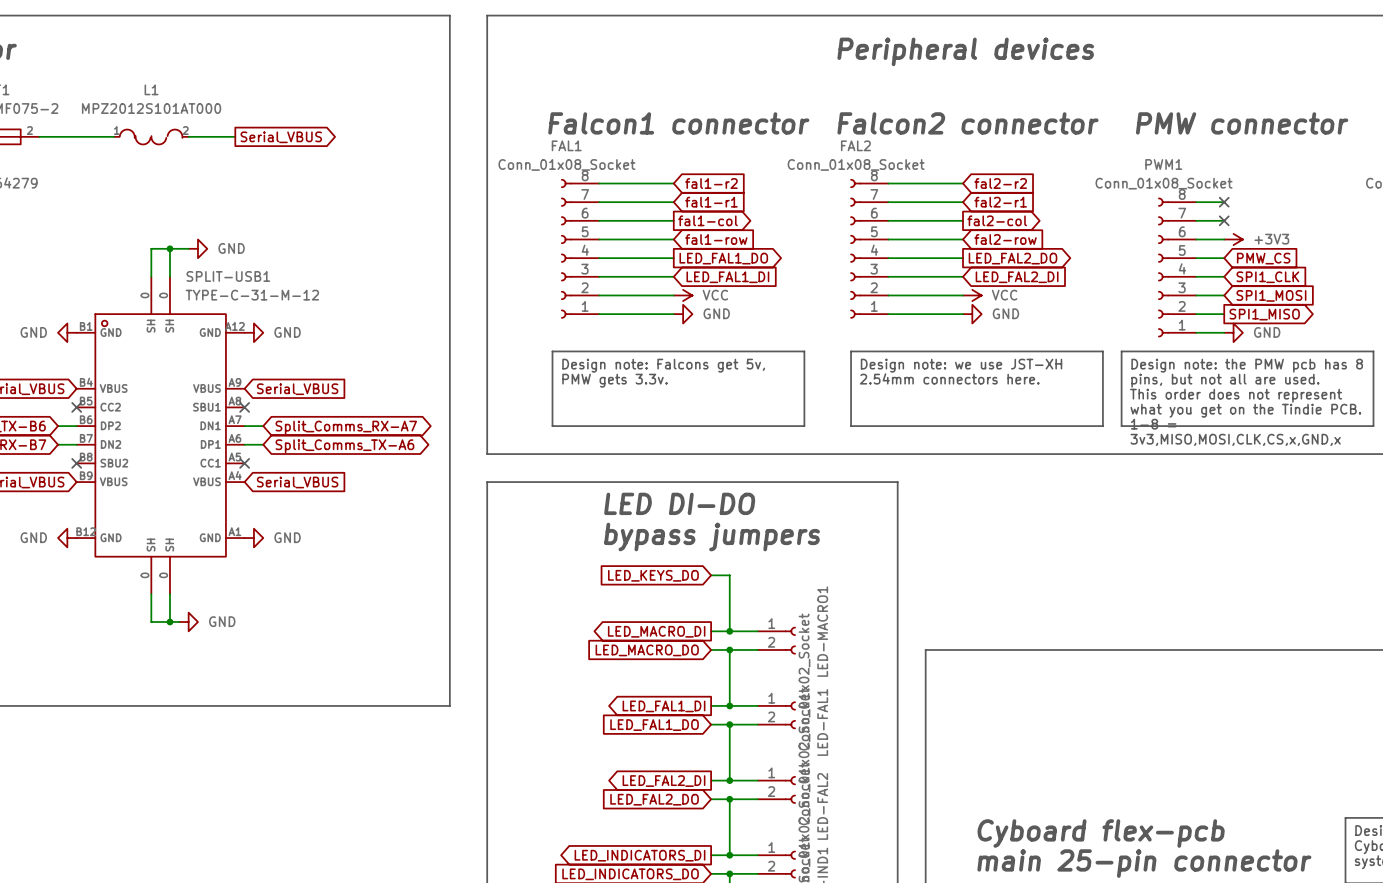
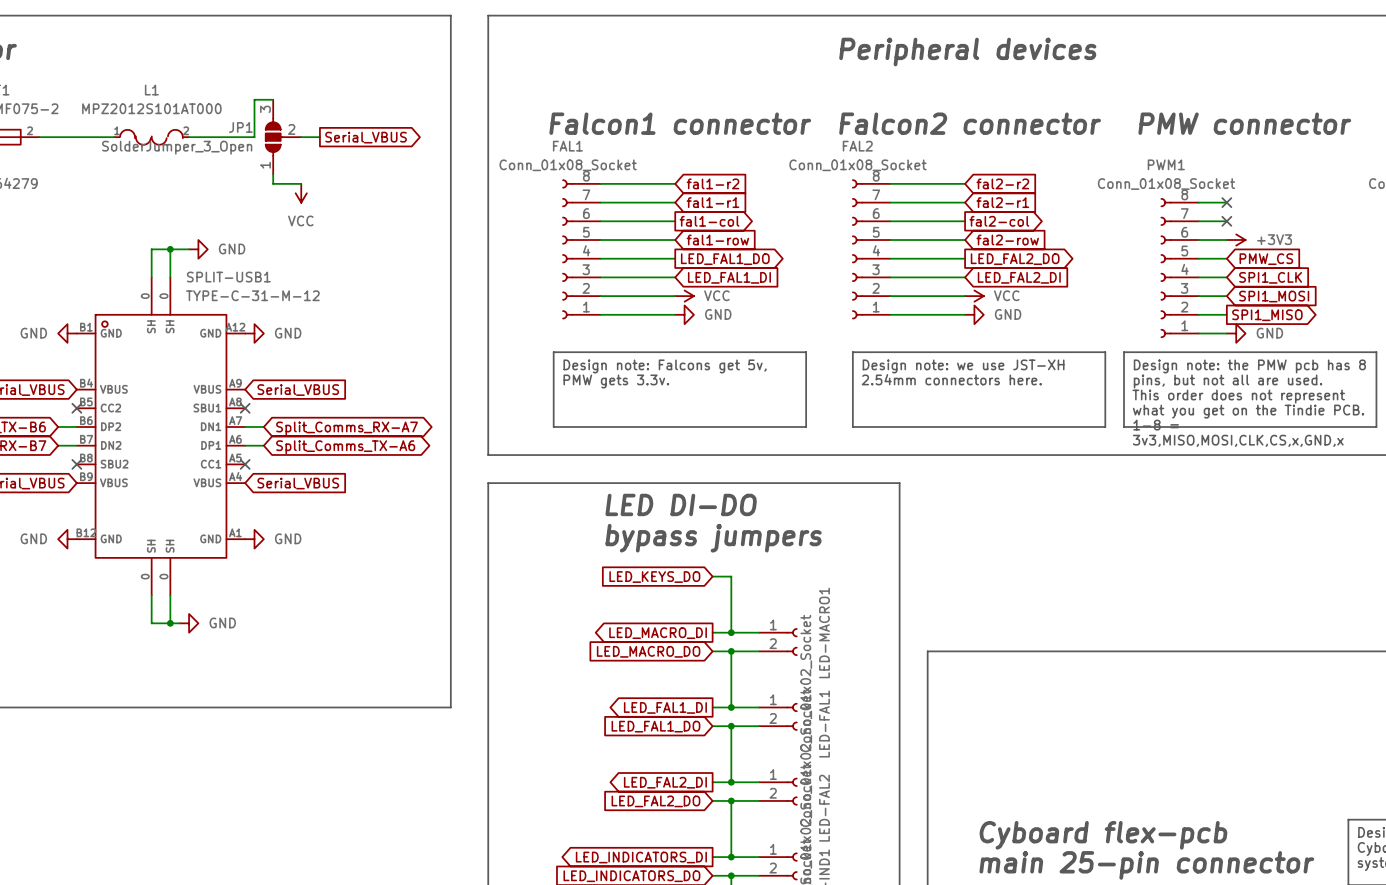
wire: none -> (273, 99) (254, 99) (254, 137) (235, 137)
JP1: none -> SolderJumper_3_Open (283, 137)
wire: none -> (301, 137) (319, 137)
global label position: Serial_VBUS (281, 137) -> Serial_VBUS (366, 137)
wire: none -> (273, 174) (273, 183) (301, 183)
power symbol: none -> VCC (301, 193)

